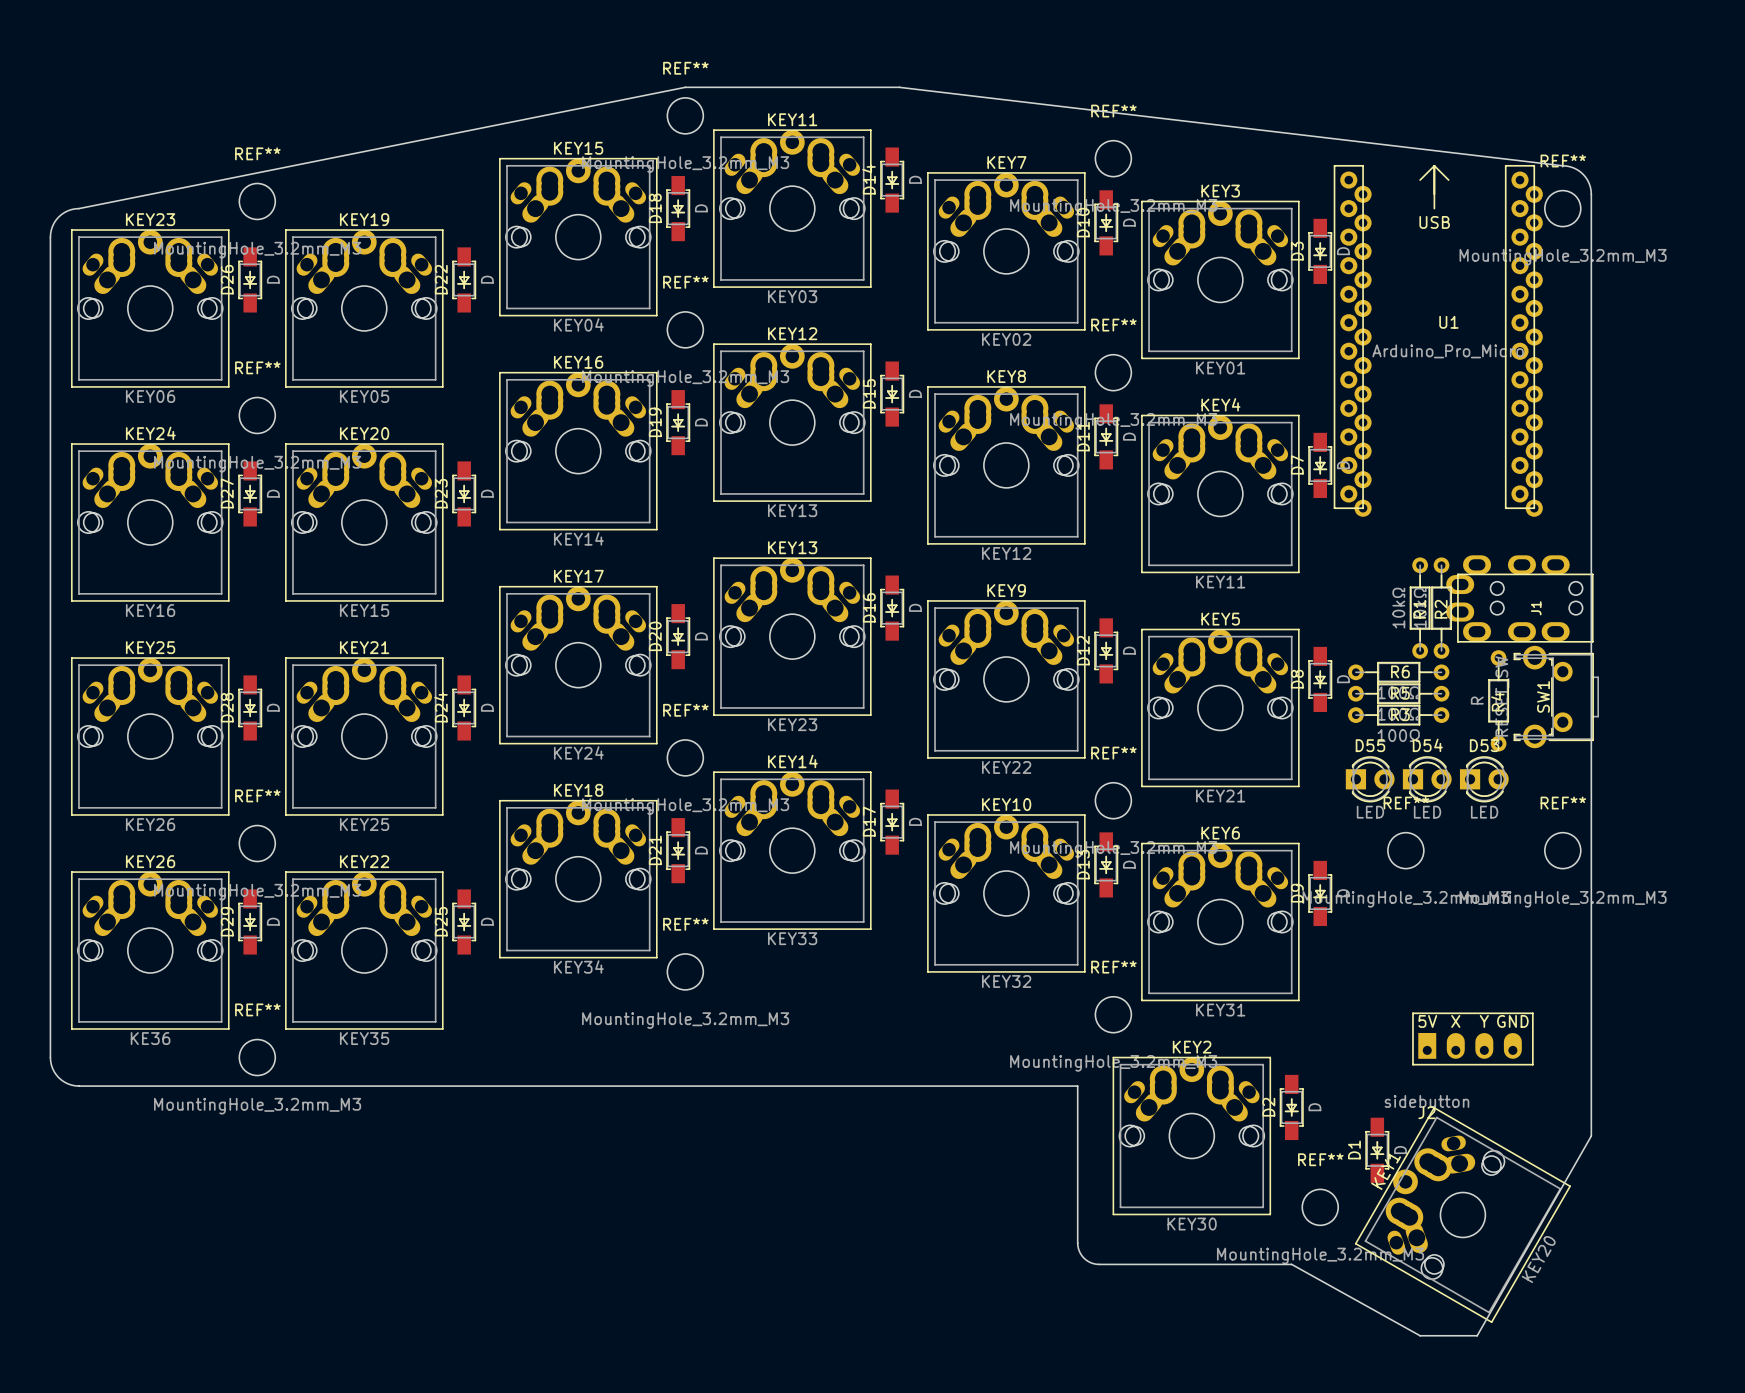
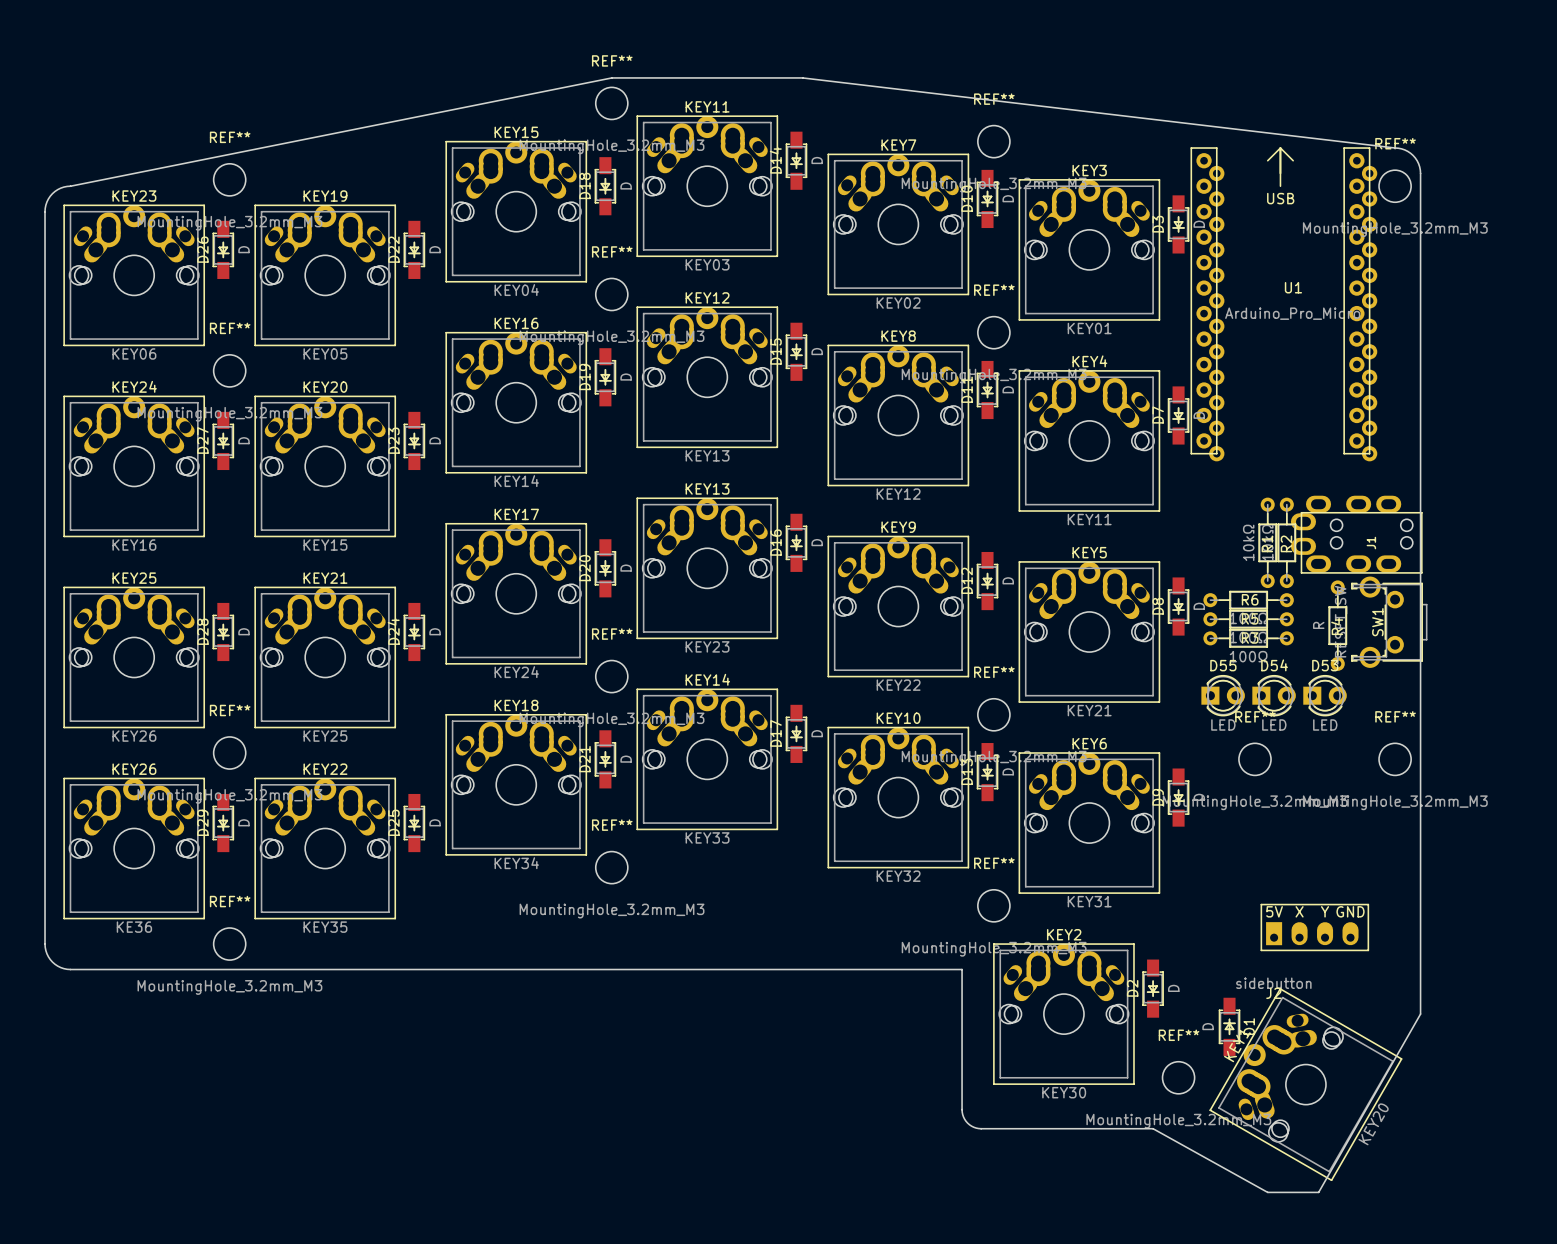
D1 rotation: 0° (1377, 1150) -> 180° (1229, 1026)

